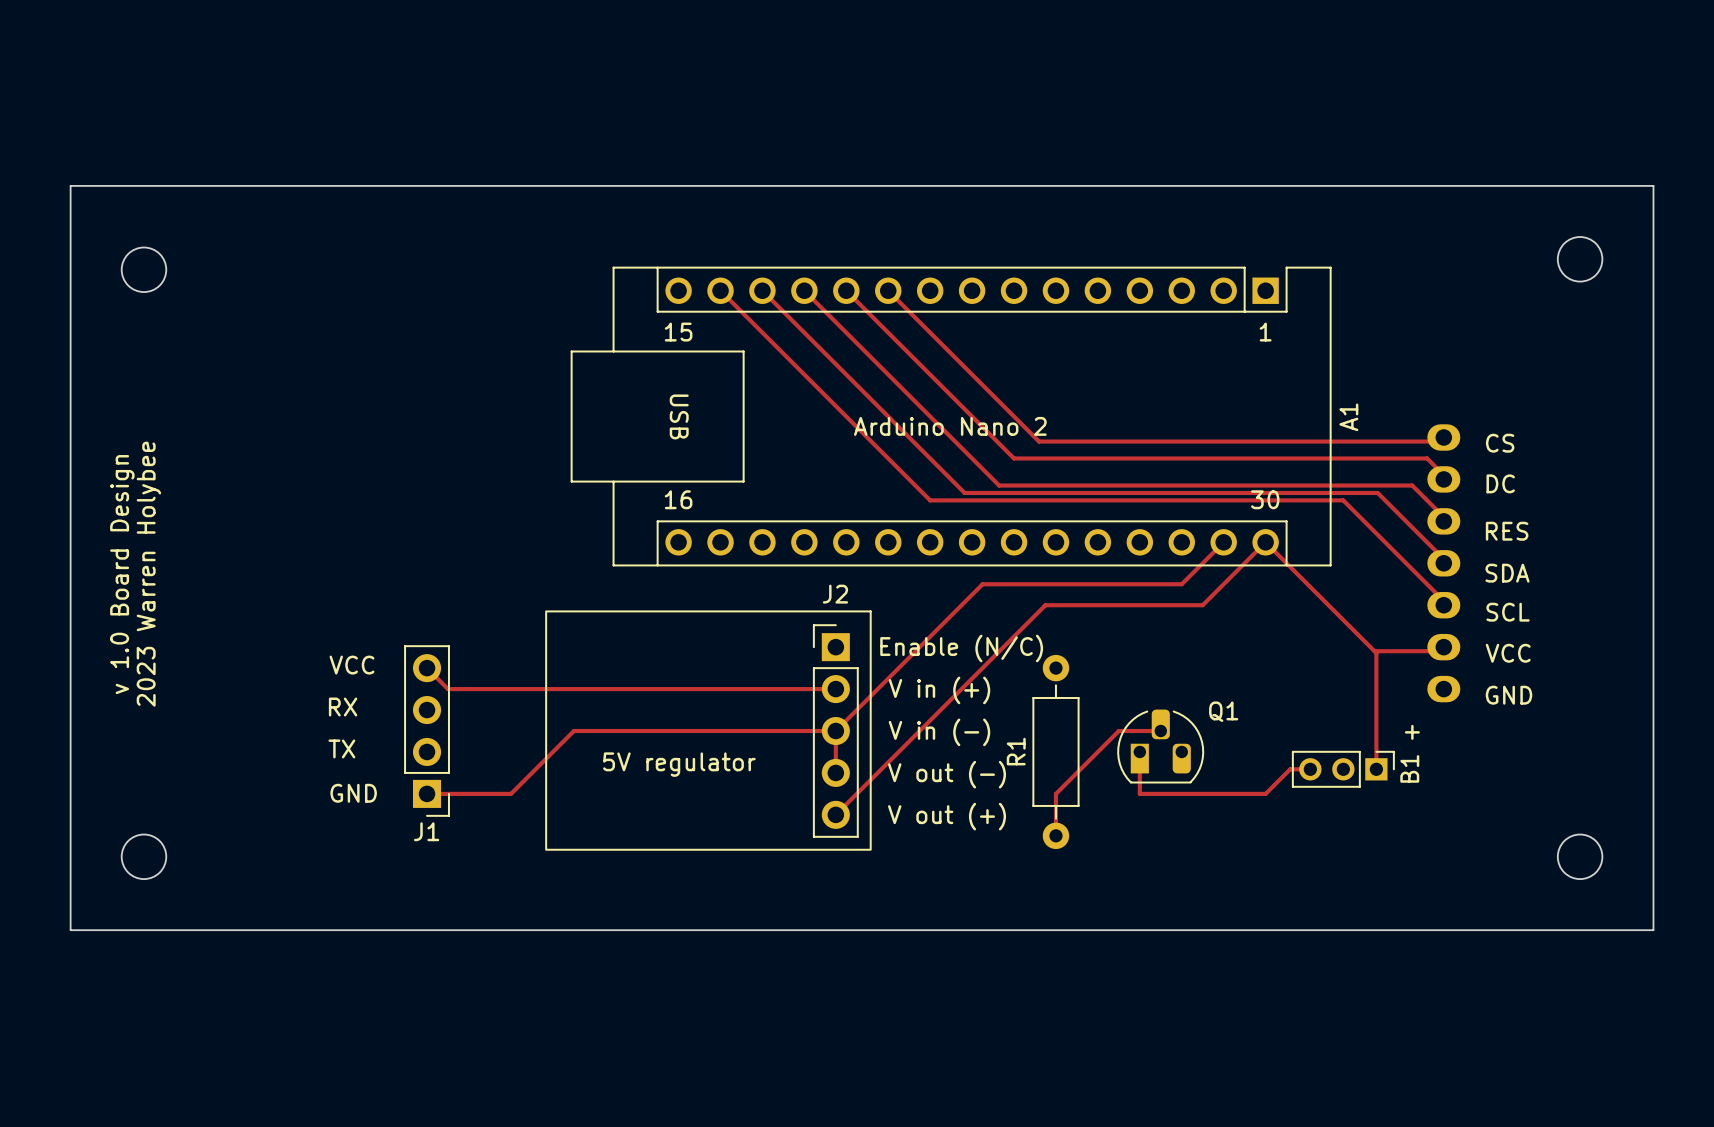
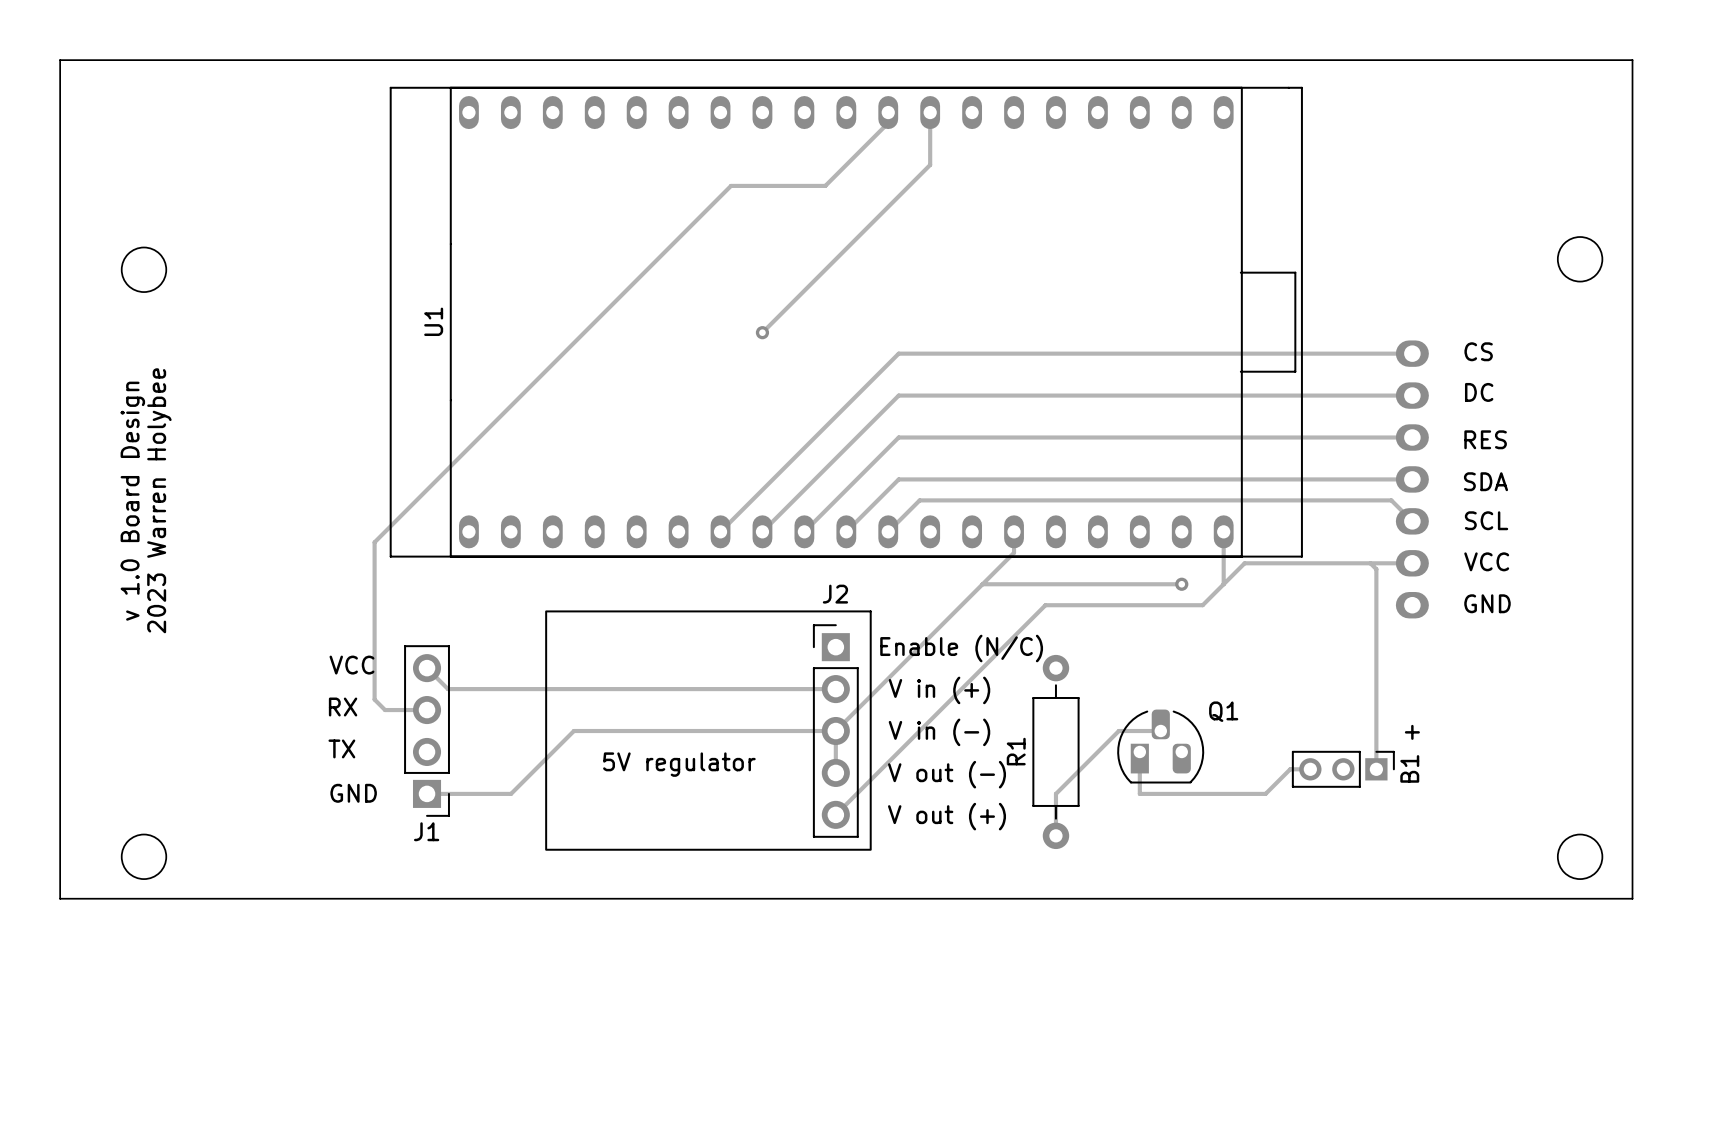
track: none -> (888, 112) (888, 123) (825, 185) (731, 185) (374, 542) (374, 699) (385, 710) (427, 710)
track: none -> (930, 112) (930, 164) (762, 332)
board edge: (70, 185) (1653, 185) (1653, 930) (70, 930) (70, 185) -> (60, 60) (60, 898) (1632, 898) (1632, 60) (60, 60)
track: (720, 290) (930, 500) -> (888, 531) (919, 500) (930, 500)
track: (762, 290) (964, 492) (1377, 492) (1452, 567) -> none
track: (804, 290) (999, 485) (1412, 485) (1452, 525) -> none
track: (846, 290) (1014, 458) (1427, 458) (1452, 483) -> none
track: (888, 290) (1039, 441) (1452, 441) -> none
U1: none -> (846, 322)
text: 15 (678, 332) -> none
via: none -> (762, 332)
text: 1 (1265, 332) -> none
track: none -> (1412, 353) (898, 353) (720, 531)
track: none -> (1412, 395) (898, 395) (762, 531)
A1: (951, 416) -> none
text: Arduino Nano 2 (950, 426) -> none
track: none -> (1412, 437) (898, 437) (804, 531)
text position: CS (1500, 443) -> CS (1478, 351)
track: none -> (1412, 479) (898, 479) (846, 531)
text position: DC (1500, 483) -> DC (1479, 392)
text: 16 (678, 499) -> none
text: 30 (1265, 499) -> none
track: (1343, 500) (1452, 609) -> (1343, 500) (1391, 500) (1412, 521)
track: none -> (1014, 531) (1014, 552) (982, 584)
track: none -> (1223, 531) (1223, 584)
text position: RES (1507, 531) -> RES (1485, 439)
track: (1223, 542) (1181, 584) -> none
track: (1244, 563) (1265, 542) (1376, 653) -> (1244, 563) (1412, 563)
track: none -> (1370, 563) (1376, 569) (1376, 653)
part position: (1443, 563) -> (1412, 479)
text position: SDA (1507, 573) -> SDA (1485, 481)
text position: v 1.0 Board Design (122, 574) -> v 1.0 Board Design (132, 501)
text position: 2023 Warren Holybee (148, 574) -> 2023 Warren Holybee (159, 500)
via: none -> (1181, 584)
text position: SCL (1508, 612) -> SCL (1486, 520)
track: (1374, 651) (1452, 651) -> none
text position: VCC (1508, 653) -> VCC (1486, 561)
text position: GND (1509, 695) -> GND (1487, 603)

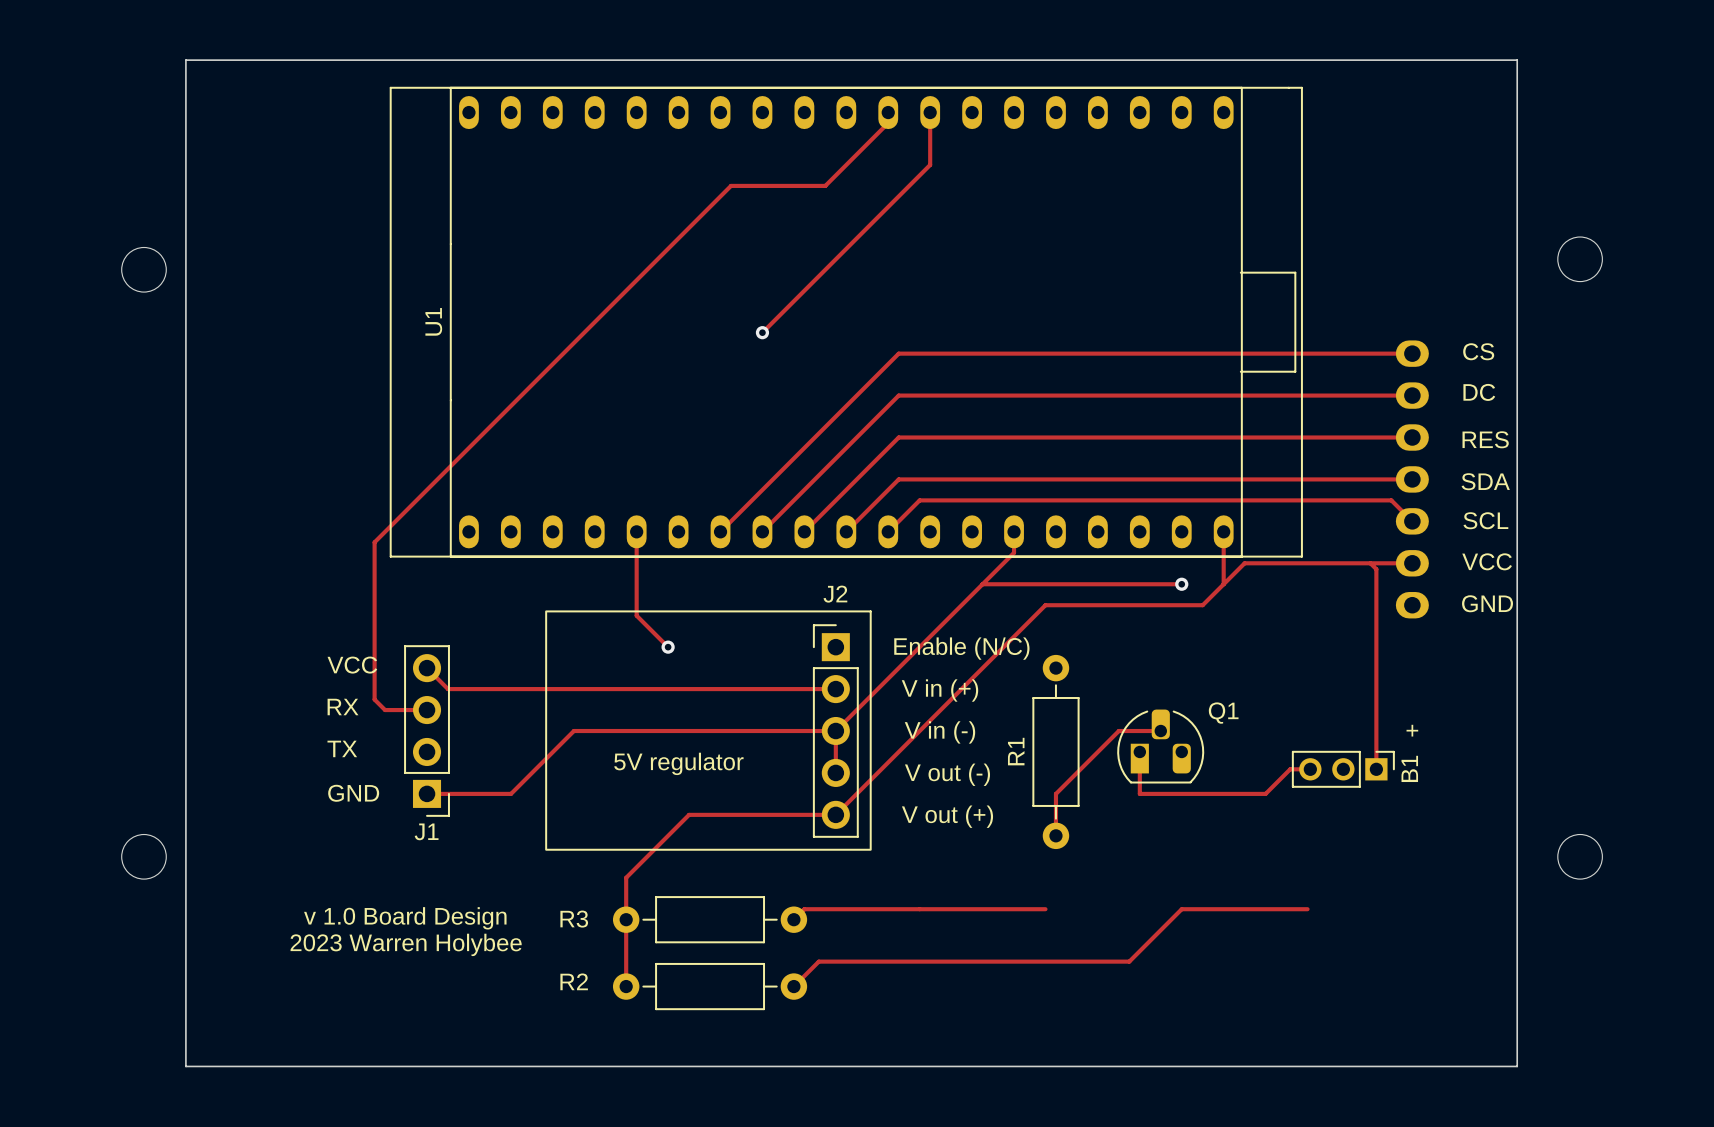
board edge: (185, 60) (60, 60) (60, 898) (1632, 898) (1632, 60) (1517, 60) -> (185, 60) (185, 1066) (1517, 1066) (1517, 60)
text: 2023 Warren Holybee (159, 500) -> none
text: v 1.0 Board Design (132, 501) -> none
track: none -> (636, 531) (636, 615) (668, 647)
via: none -> (668, 647)
track: none -> (835, 814) (689, 814) (626, 877) (626, 986)
track: none -> (1045, 909) (804, 909) (793, 919)
track: none -> (1307, 909) (1181, 909) (1129, 961) (818, 961) (793, 986)
text: none -> v 1.0 Board Design (405, 918)
R3: none -> (710, 919)
text: none -> 2023 Warren Holybee (406, 944)
R2: none -> (710, 986)

